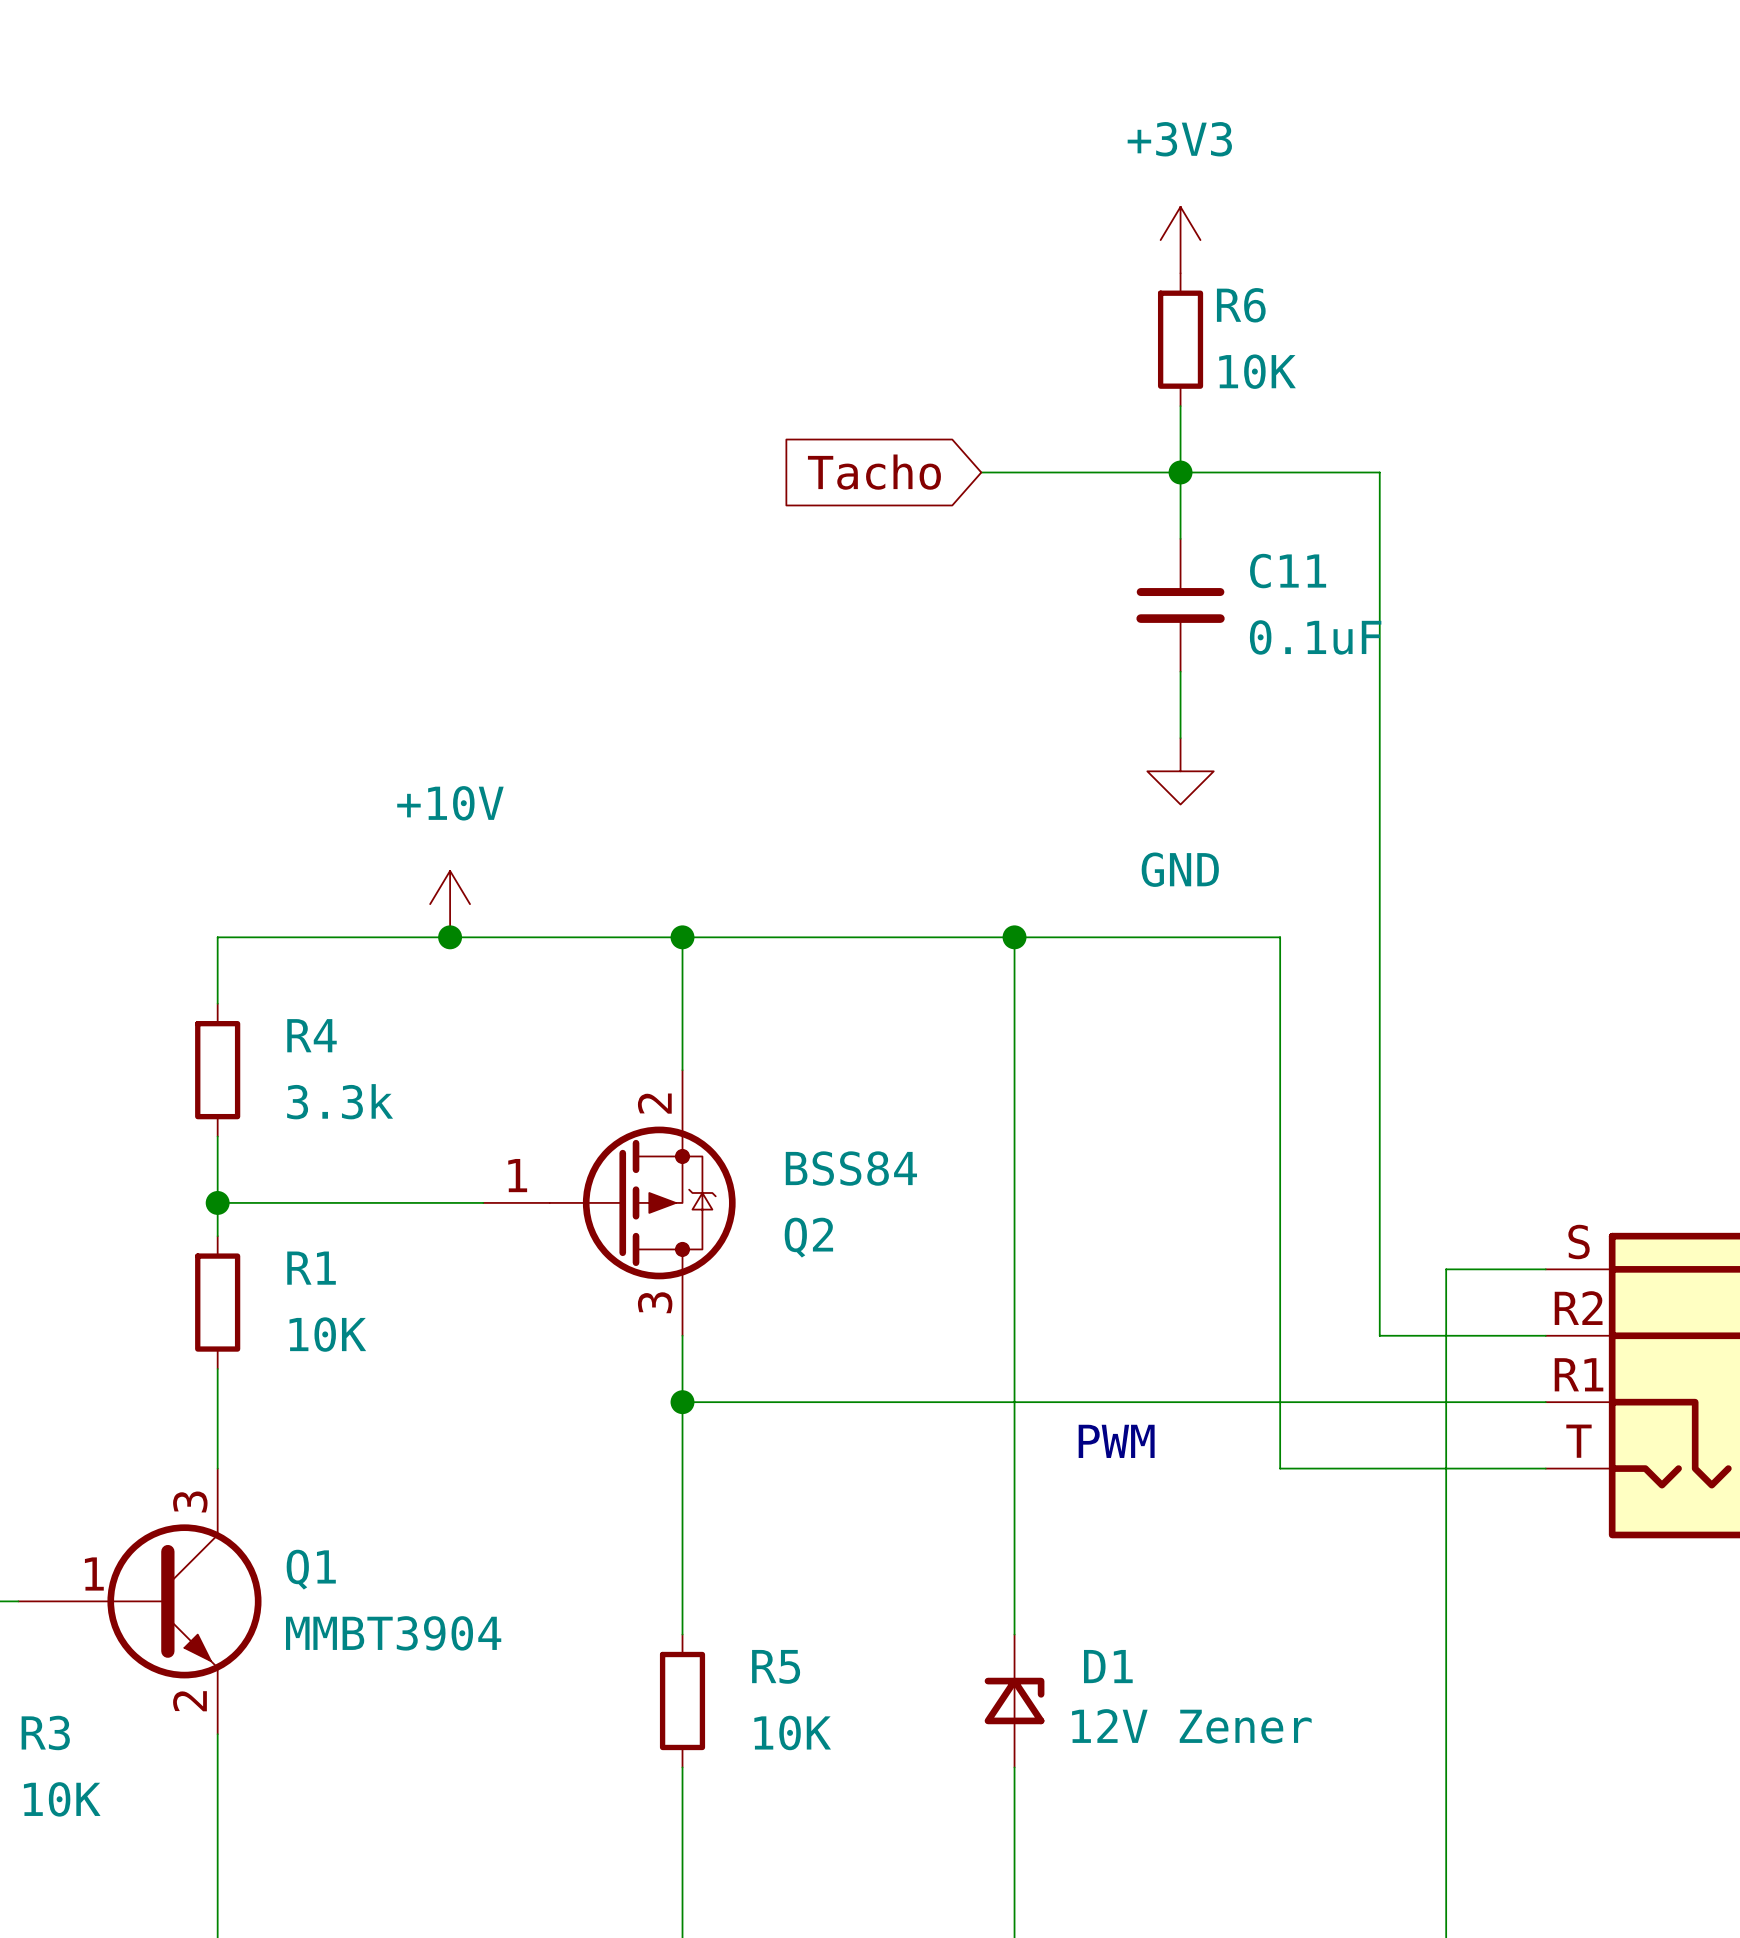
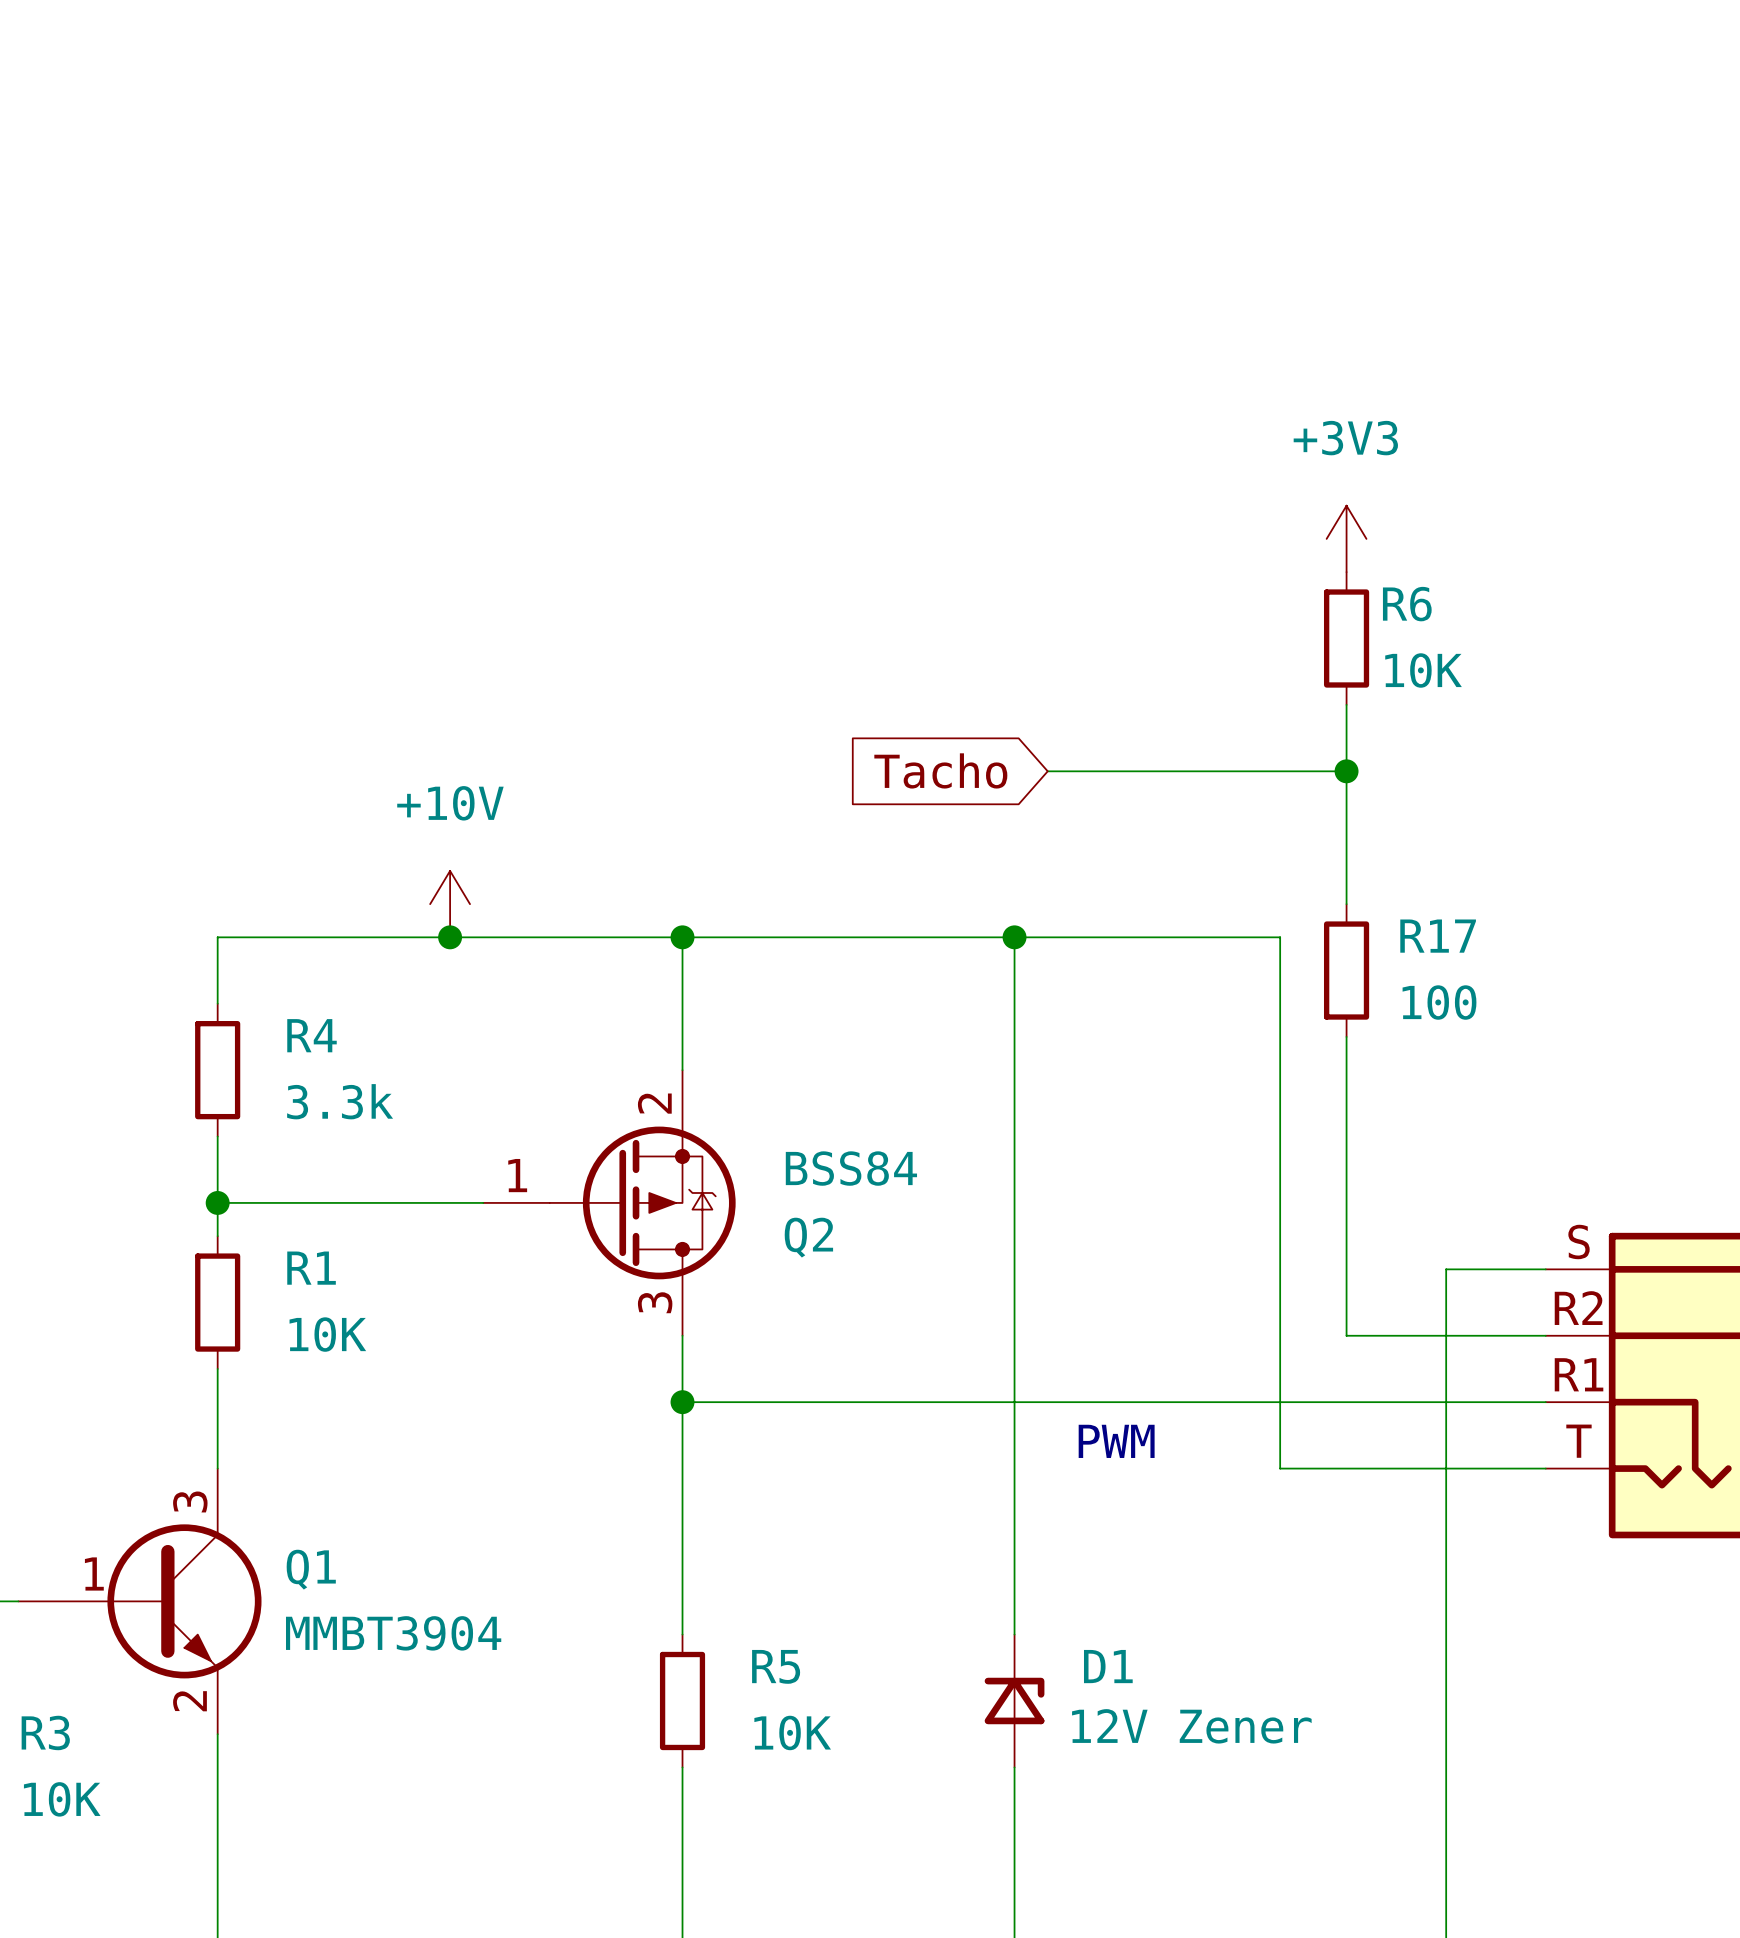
power symbol position: +3V3 (1180, 240) -> +3V3 (1346, 538)
R6 position: (1180, 339) -> (1346, 638)
wire: (1180, 406) (1180, 538) -> none
global label position: Tacho (874, 472) -> Tacho (940, 770)
wire: (981, 472) (1379, 472) (1379, 1335) -> (1346, 1036) (1346, 1335) (1379, 1335)
junction: (1180, 472) -> none
C11: 0.1uF (1180, 605) -> none
wire: (1180, 671) (1180, 738) -> none
wire: none -> (1346, 704) (1346, 904)
wire: none -> (1047, 771) (1346, 771)
power symbol: GND (1180, 771) -> none
junction: none -> (1346, 771)
R17: none -> 100 (1346, 970)

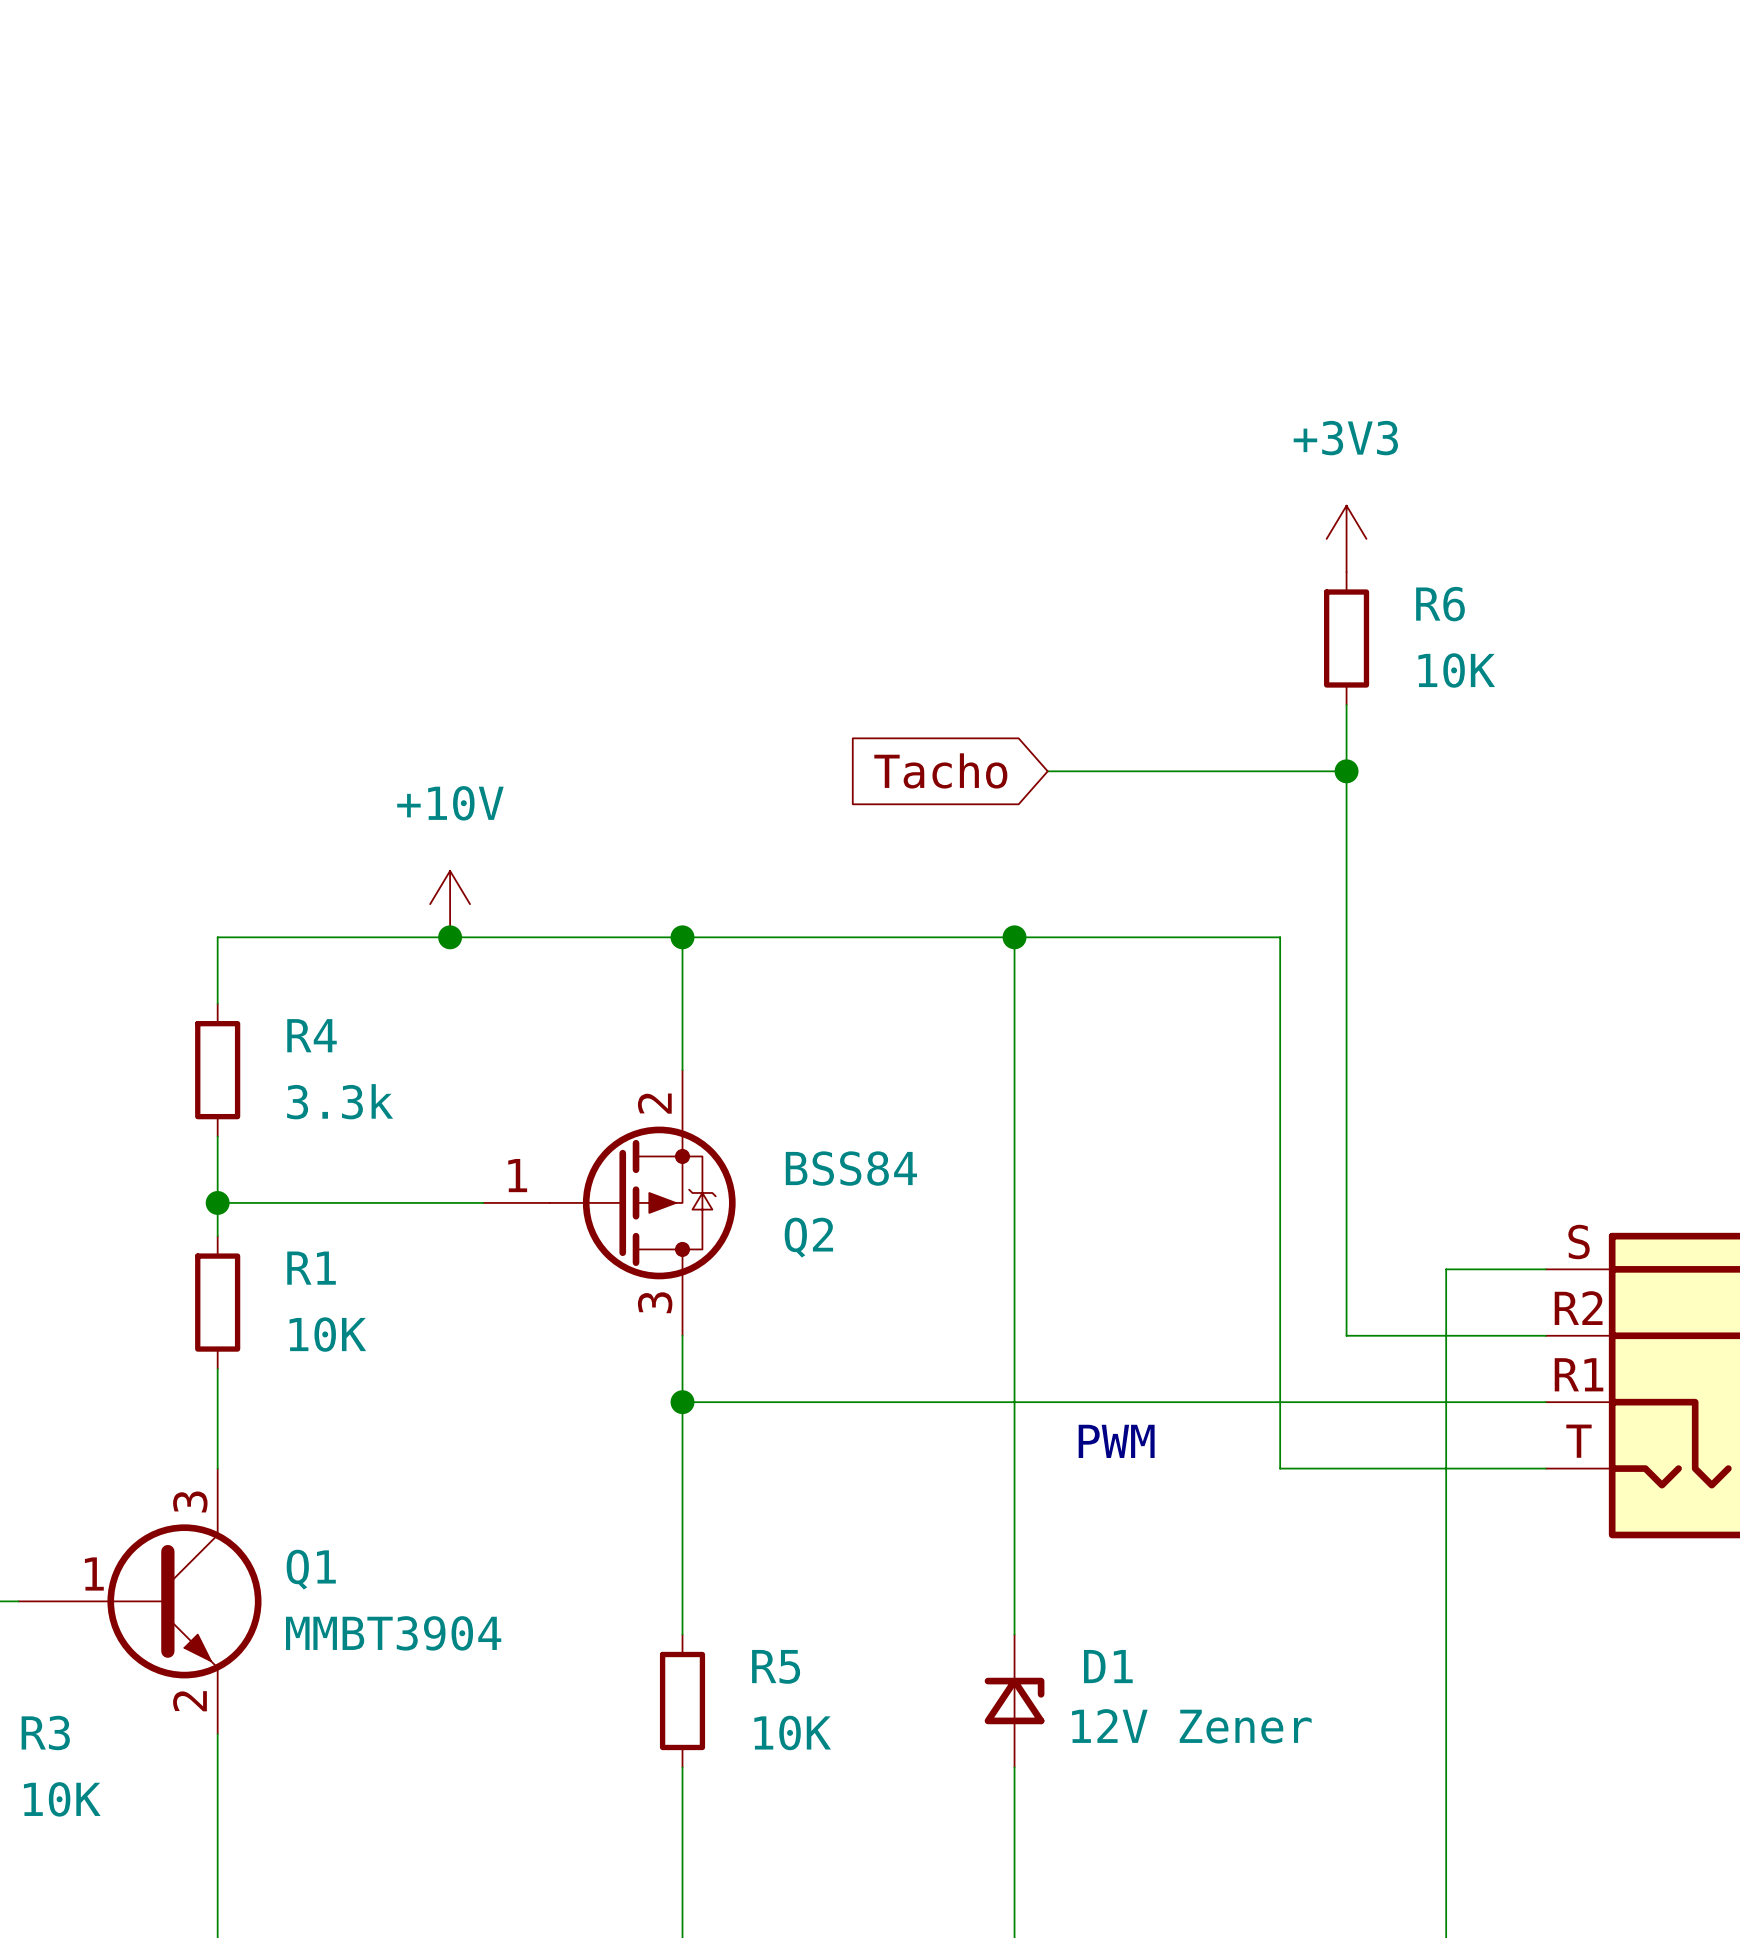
R6 name position: R6 (1407, 604) -> R6 (1440, 604)
R6 value position: 10K (1423, 670) -> 10K (1456, 670)
wire: none -> (1346, 904) (1346, 1036)
R17: 100 (1346, 970) -> none

